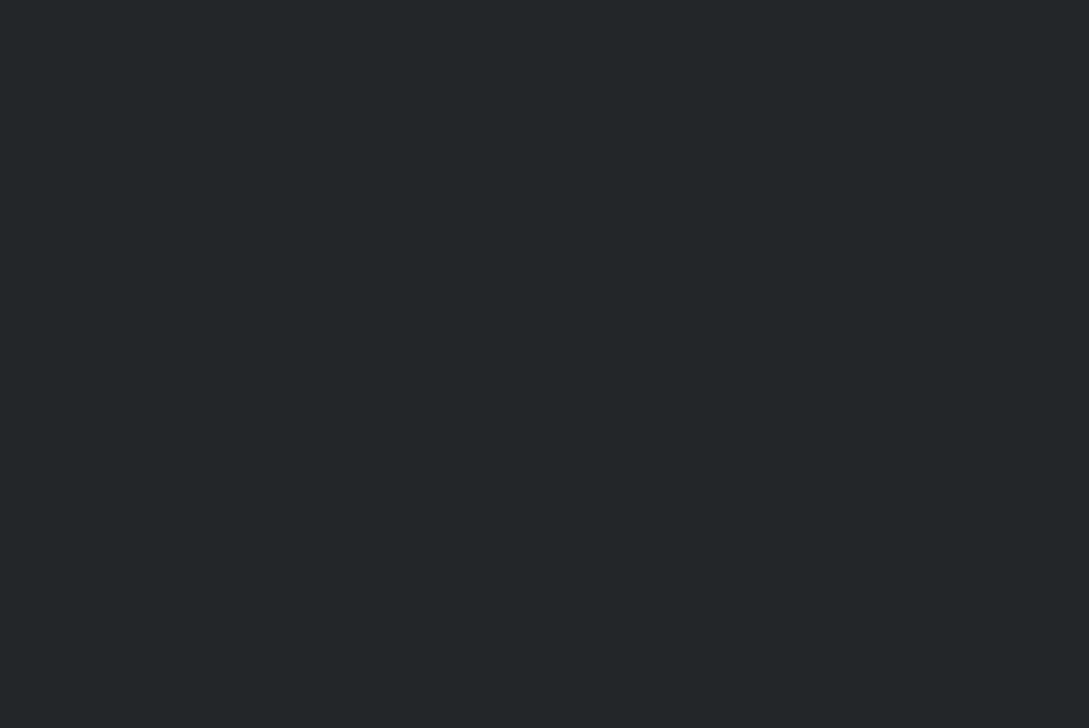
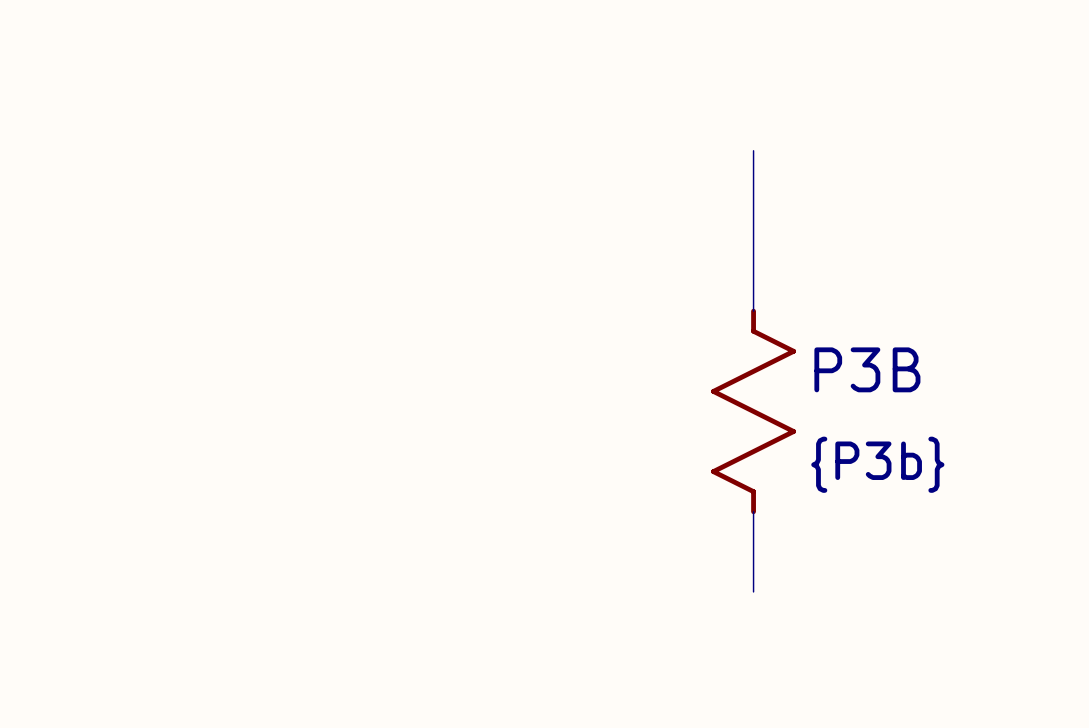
wire: none -> (753, 150) (753, 311)
P3B: none -> {P3b} (753, 411)
wire: none -> (753, 511) (753, 591)

